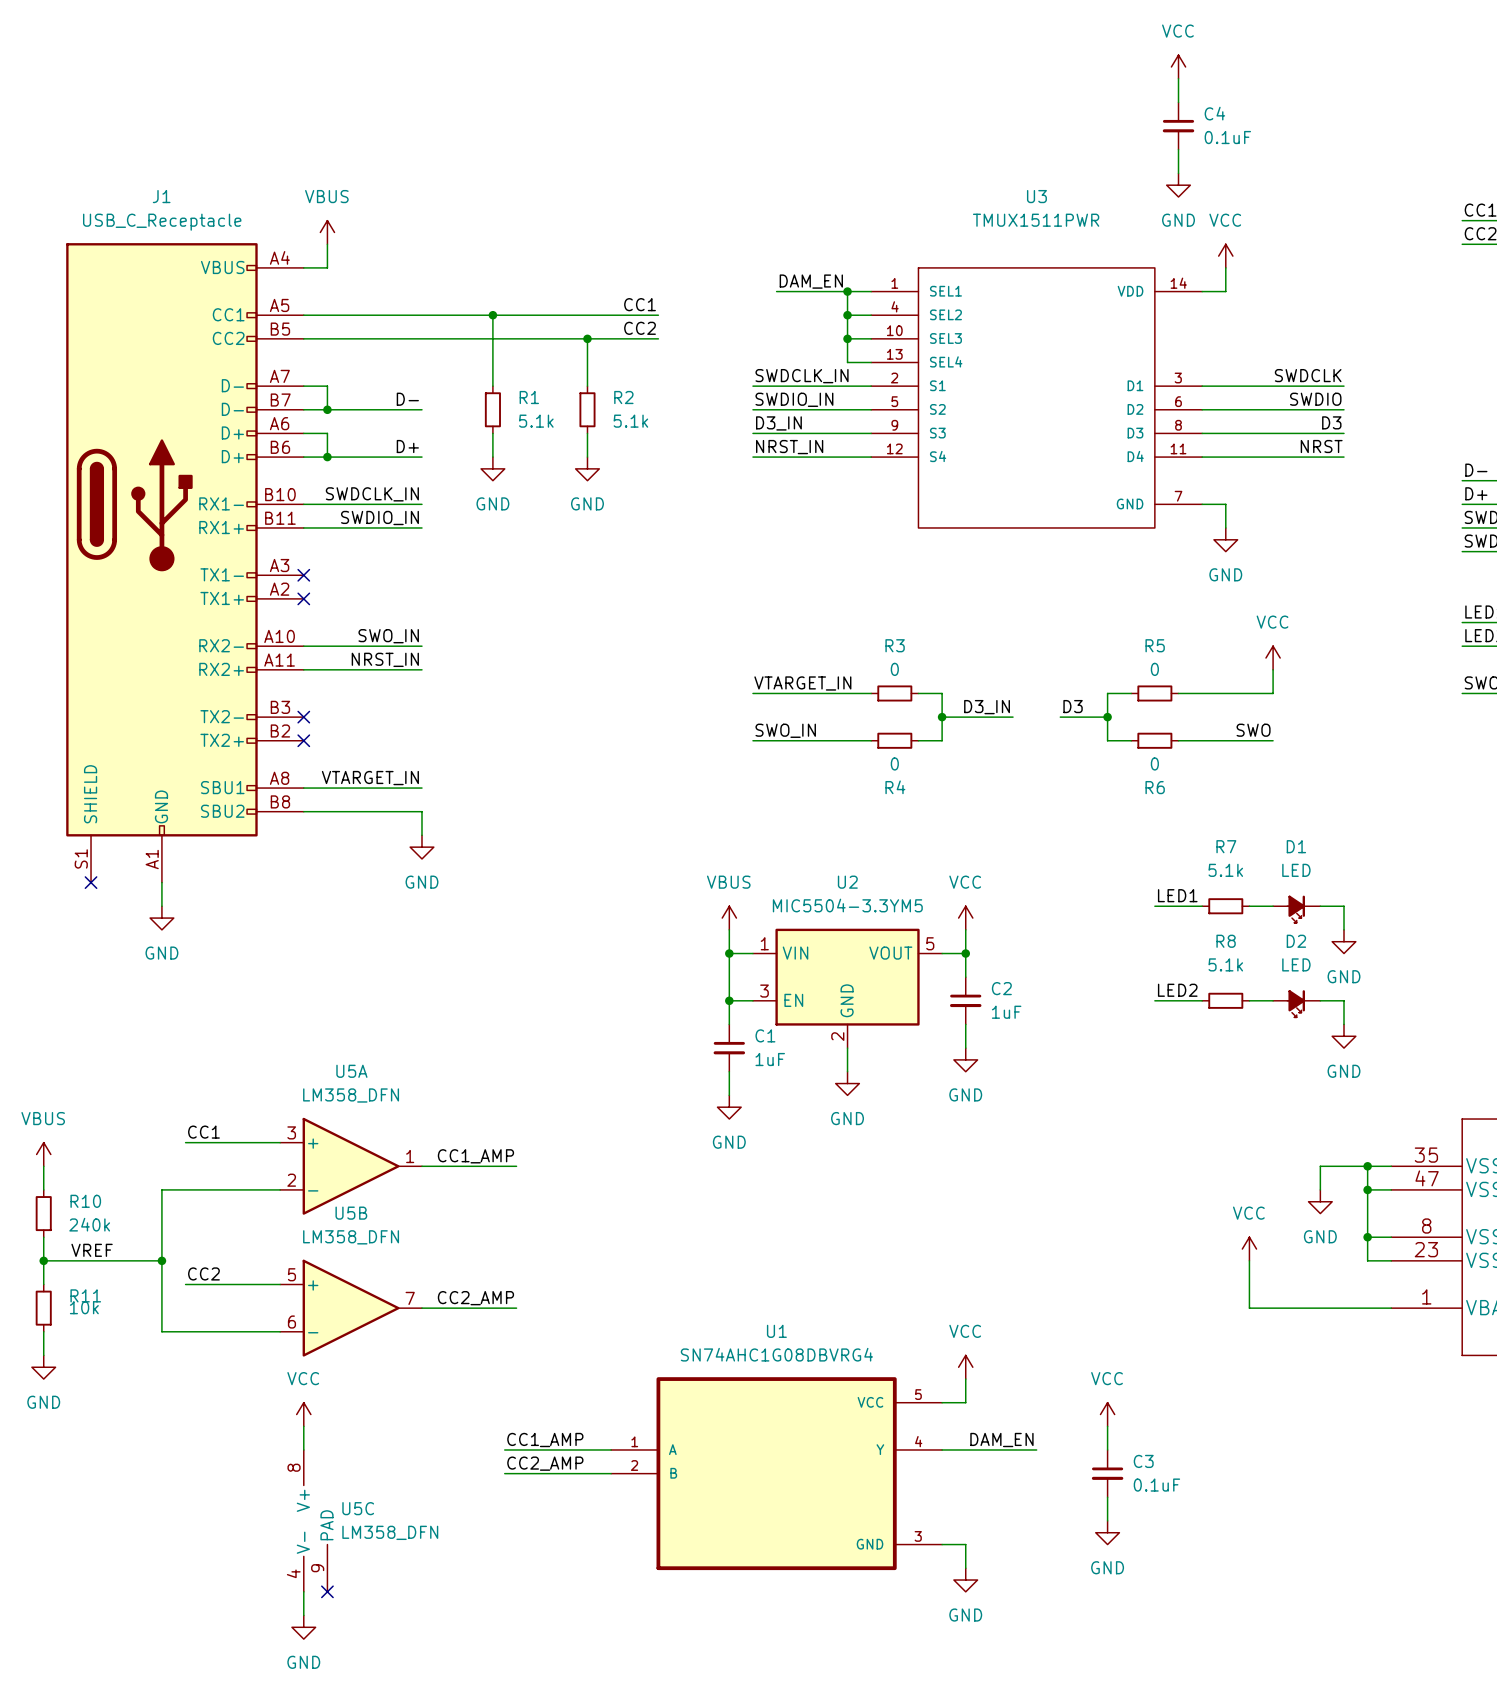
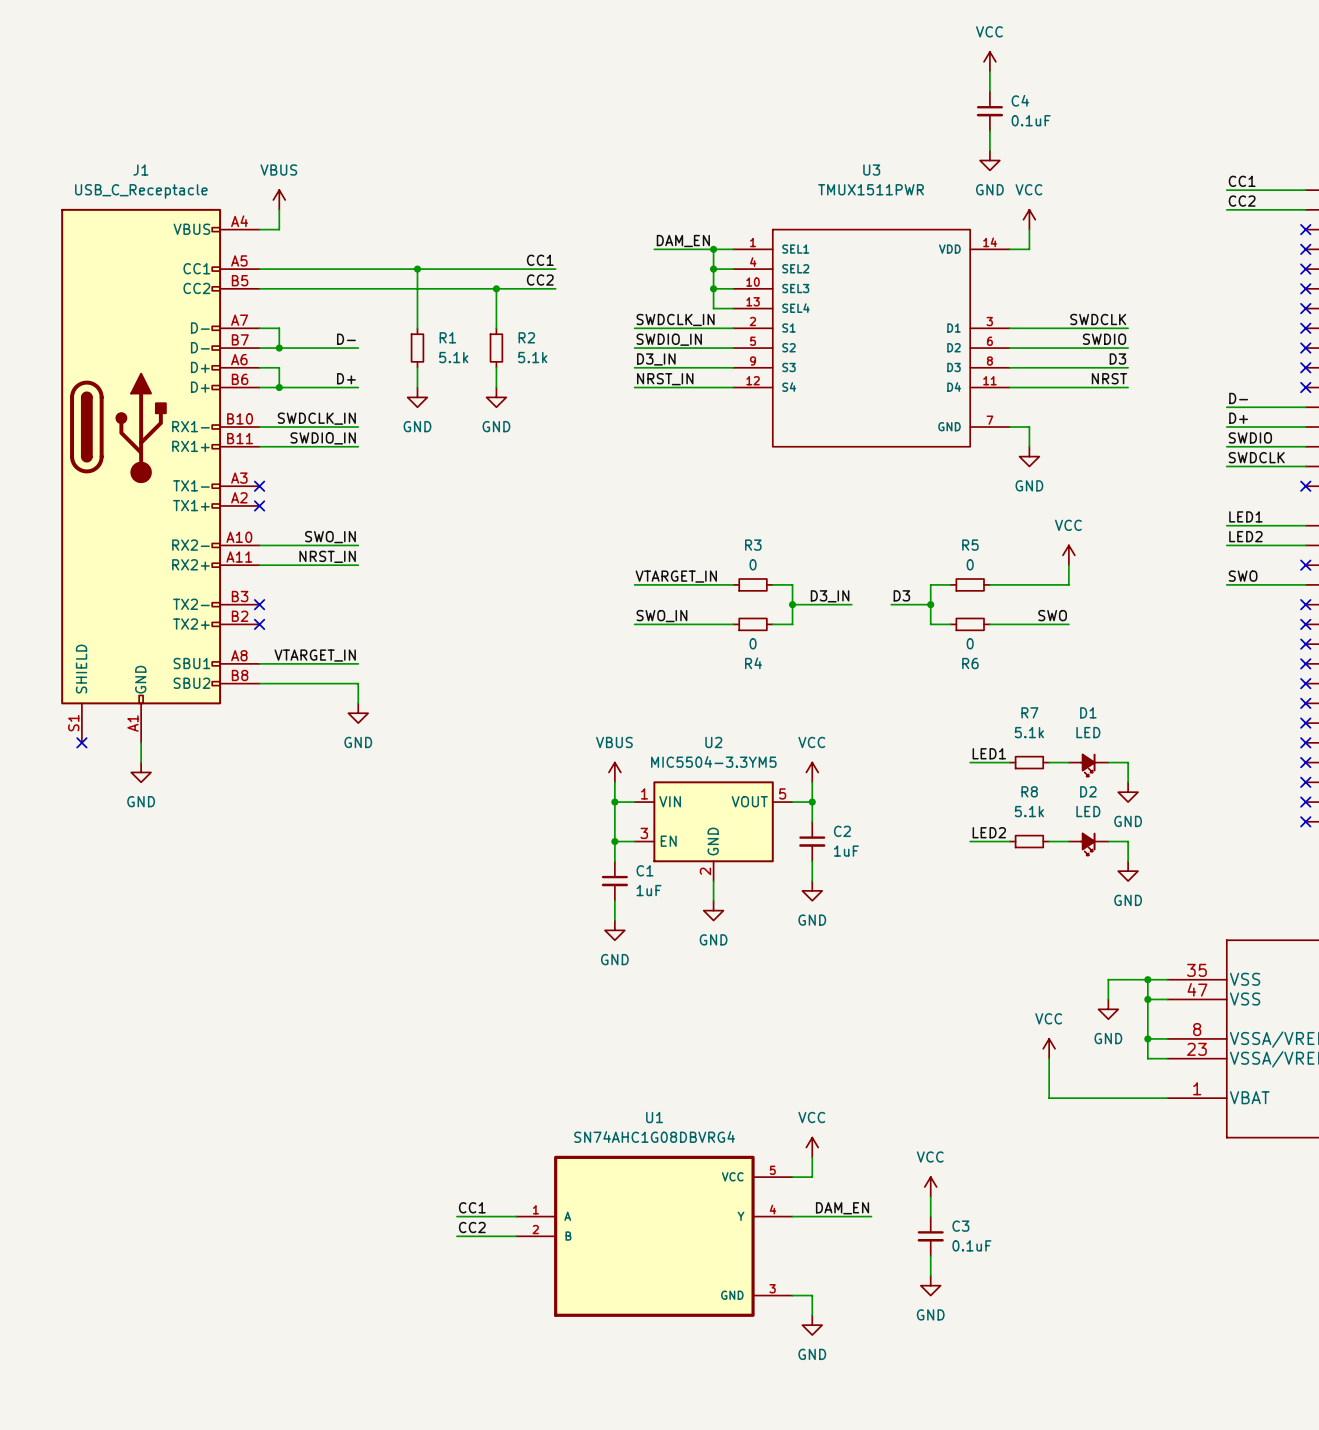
label: CC1 (203, 1132) -> none
wire: (185, 1142) (280, 1142) -> none
power symbol: VBUS (43, 1154) -> none
label: CC1_AMP (475, 1156) -> none
wire: (43, 1166) (43, 1189) -> none
U5A: LM358_DFN (351, 1166) -> none
wire: (421, 1166) (516, 1166) -> none
wire: (280, 1189) (161, 1189) (161, 1331) (280, 1331) -> none
R10: 240k (43, 1213) -> none
wire: (43, 1237) (43, 1284) -> none
label: VREF (92, 1250) -> none
wire: (43, 1260) (161, 1260) -> none
junction: (43, 1260) -> none
junction: (161, 1260) -> none
label: CC2 (203, 1273) -> none
wire: (185, 1284) (280, 1284) -> none
label: CC2_AMP (475, 1298) -> none
R11: 10k (43, 1308) -> none
U5B: LM358_DFN (351, 1308) -> none
wire: (421, 1308) (516, 1308) -> none
wire: (43, 1331) (43, 1355) -> none
power symbol: GND (43, 1367) -> none
power symbol: VCC (303, 1414) -> none
wire: (303, 1426) (303, 1449) -> none
label: none -> CC1 (472, 1207)
label: CC1_AMP (545, 1440) -> none
wire: (504, 1449) (540, 1449) -> none
label: CC2_AMP (545, 1463) -> none
label: none -> CC2 (472, 1227)
wire: (504, 1473) (540, 1473) -> none
U5C: LM358_DFN (315, 1520) -> none
wire: (303, 1591) (303, 1615) -> none
no-connect mark: (327, 1591) -> none
power symbol: GND (303, 1627) -> none

